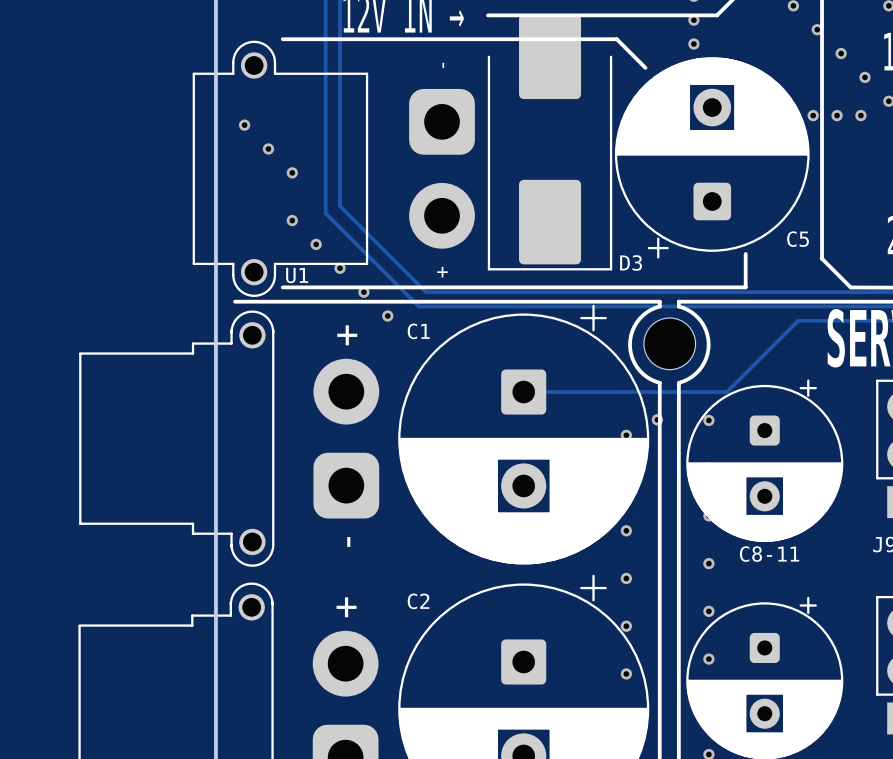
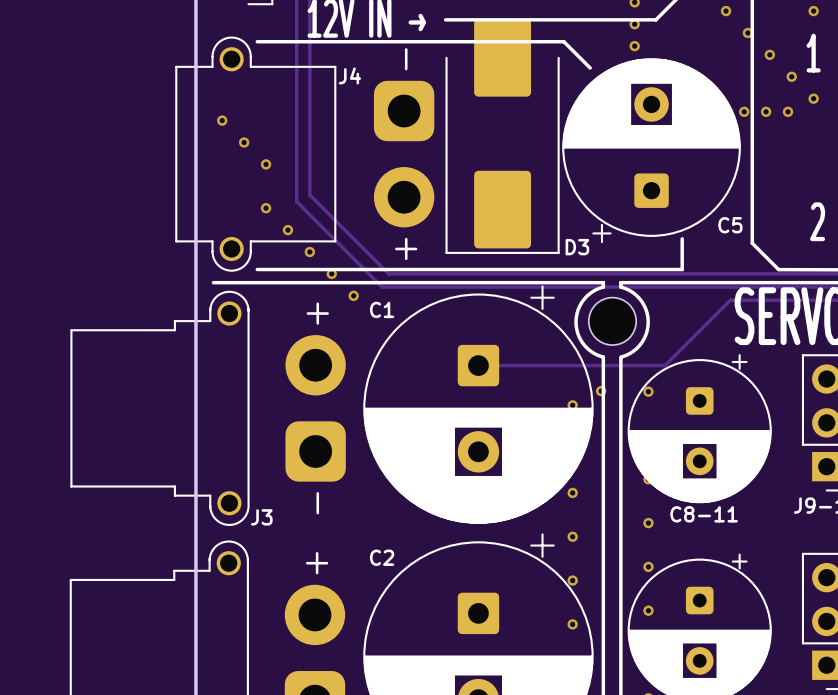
J4 footprint: [192, 40, 475, 297] -> [175, 36, 435, 272]
J4 name: none -> J4 (349, 75)
U1 name: U1 (297, 275) -> J3 (261, 517)

